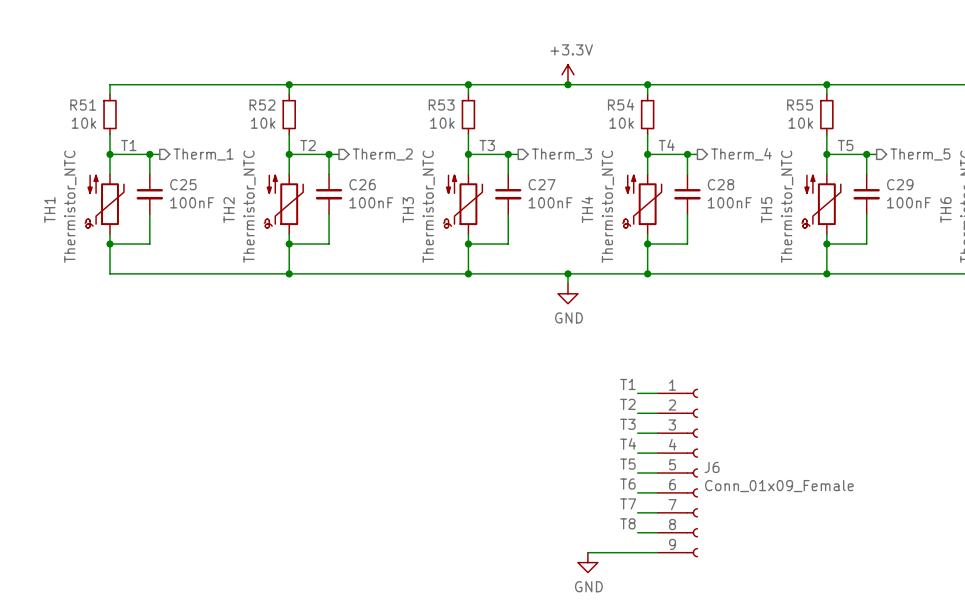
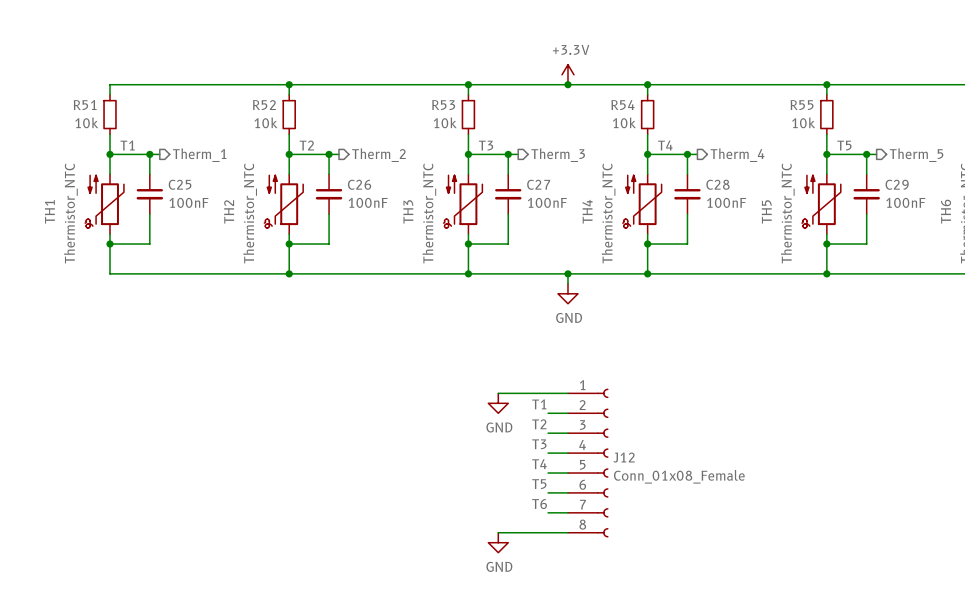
label position: T1 (627, 384) -> T1 (539, 404)
wire: none -> (498, 393) (567, 393)
wire: (637, 393) (657, 393) -> none
power symbol: none -> GND (498, 403)
label position: T2 (627, 404) -> T2 (539, 424)
wire: (637, 413) (657, 413) -> none
label position: T3 (627, 424) -> T3 (539, 444)
wire: (637, 433) (657, 433) -> (548, 413) (567, 413)
label position: T4 (628, 443) -> T4 (539, 464)
wire: (637, 453) (657, 453) -> (548, 433) (567, 433)
J12: none -> Conn_01x08_Female (588, 463)
label position: T5 (627, 464) -> T5 (539, 484)
wire: (637, 473) (657, 473) -> (548, 453) (567, 453)
J6: Conn_01x09_Female (677, 473) -> none
label position: T6 (627, 484) -> T6 (539, 504)
wire: (637, 492) (657, 492) -> (548, 473) (567, 473)
label: T7 (628, 503) -> none
wire: (637, 512) (657, 512) -> (548, 492) (567, 492)
label: T8 (627, 523) -> none
wire: (637, 532) (657, 532) -> (548, 512) (567, 512)
power symbol: none -> GND (498, 542)
wire: (587, 552) (657, 552) -> (498, 532) (567, 532)
power symbol: GND (587, 562) -> none

